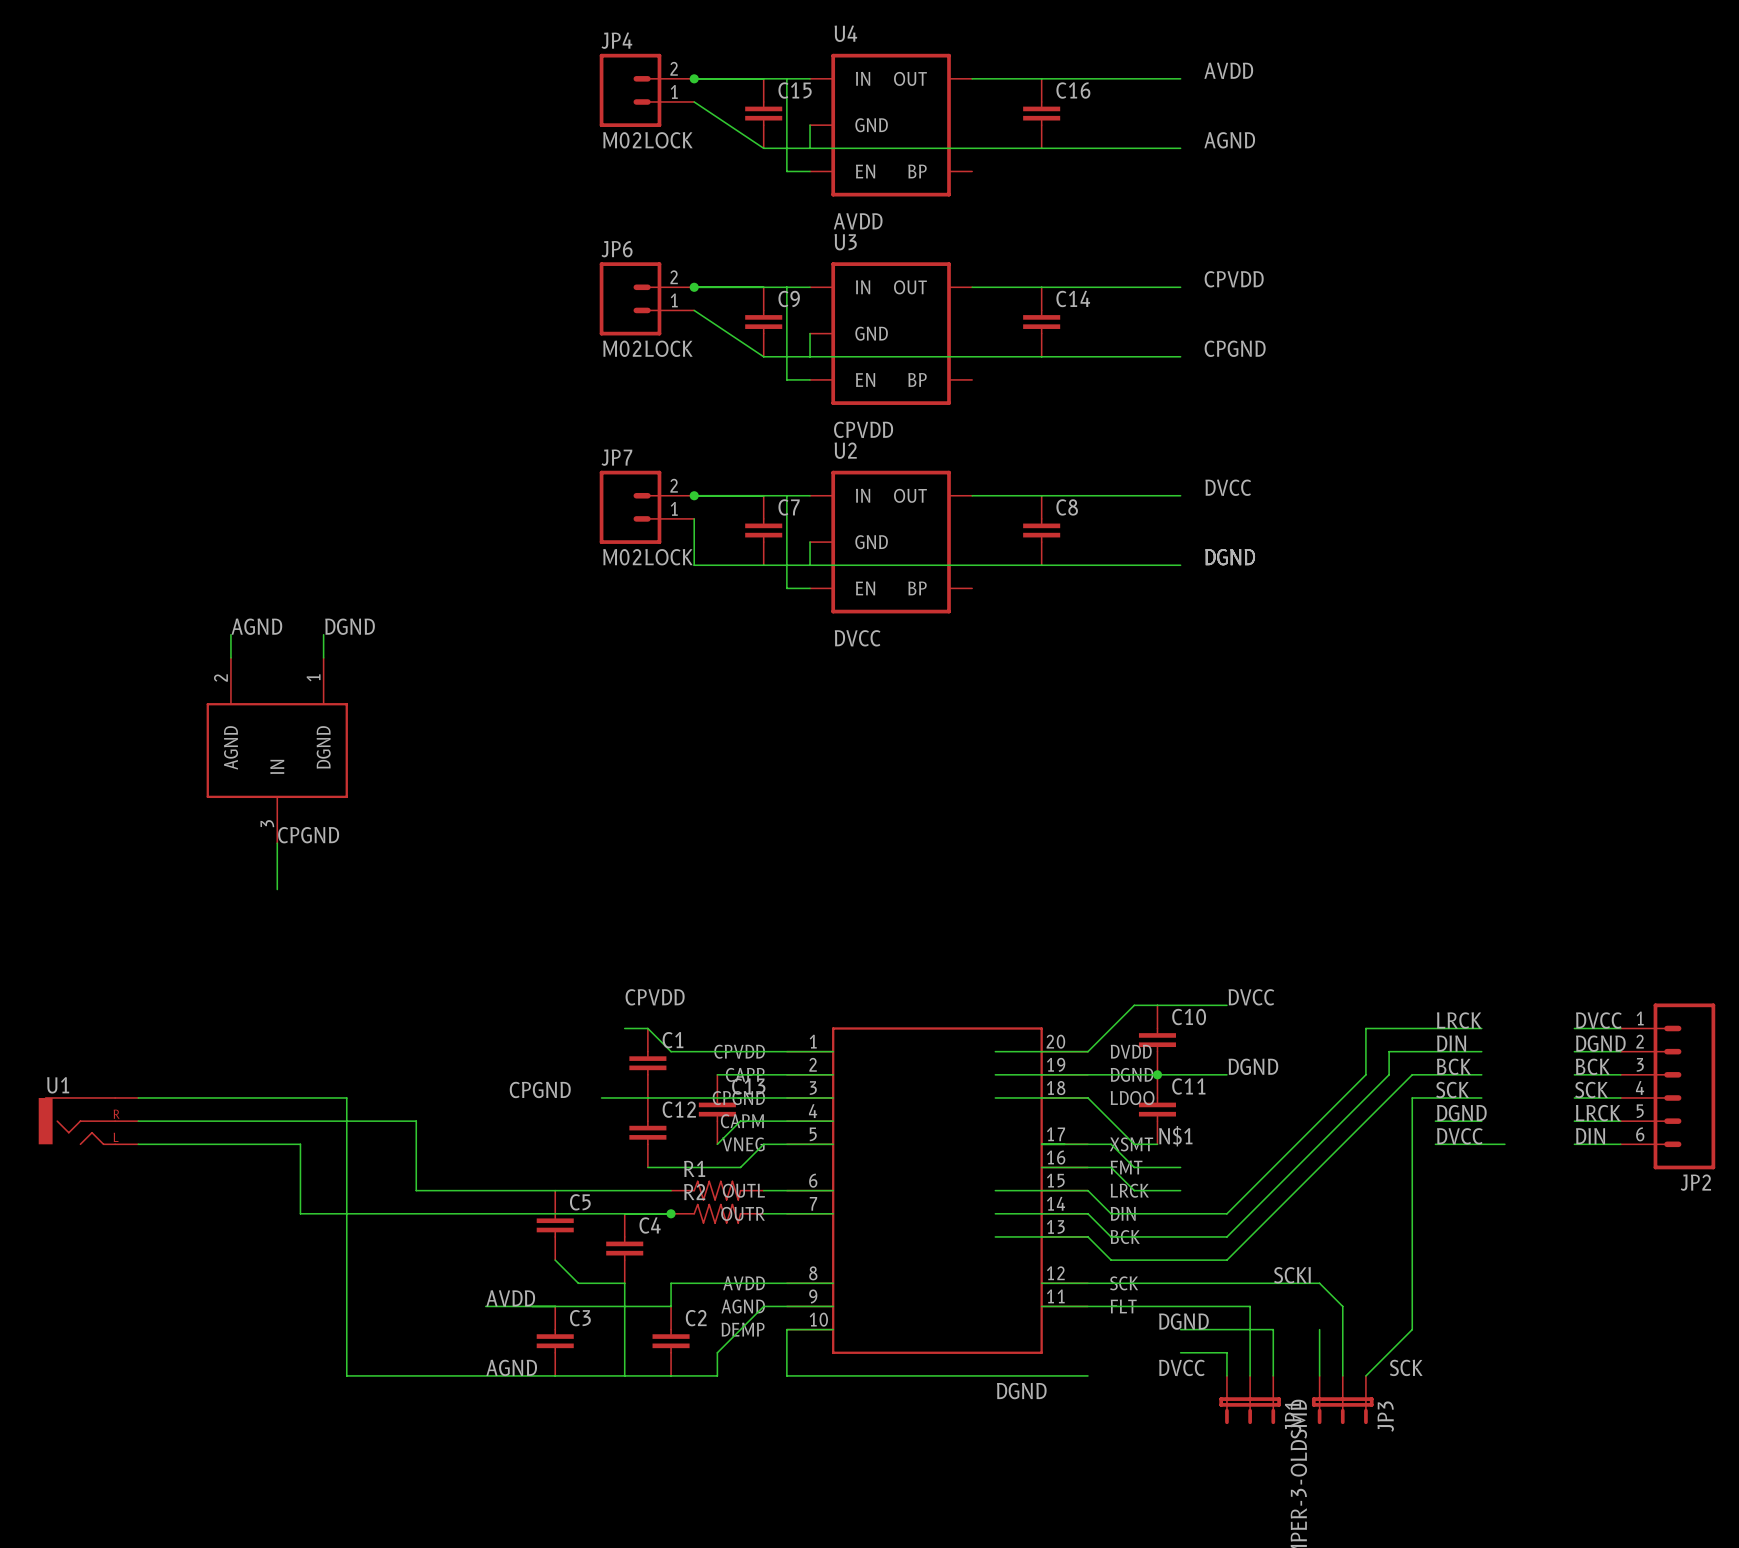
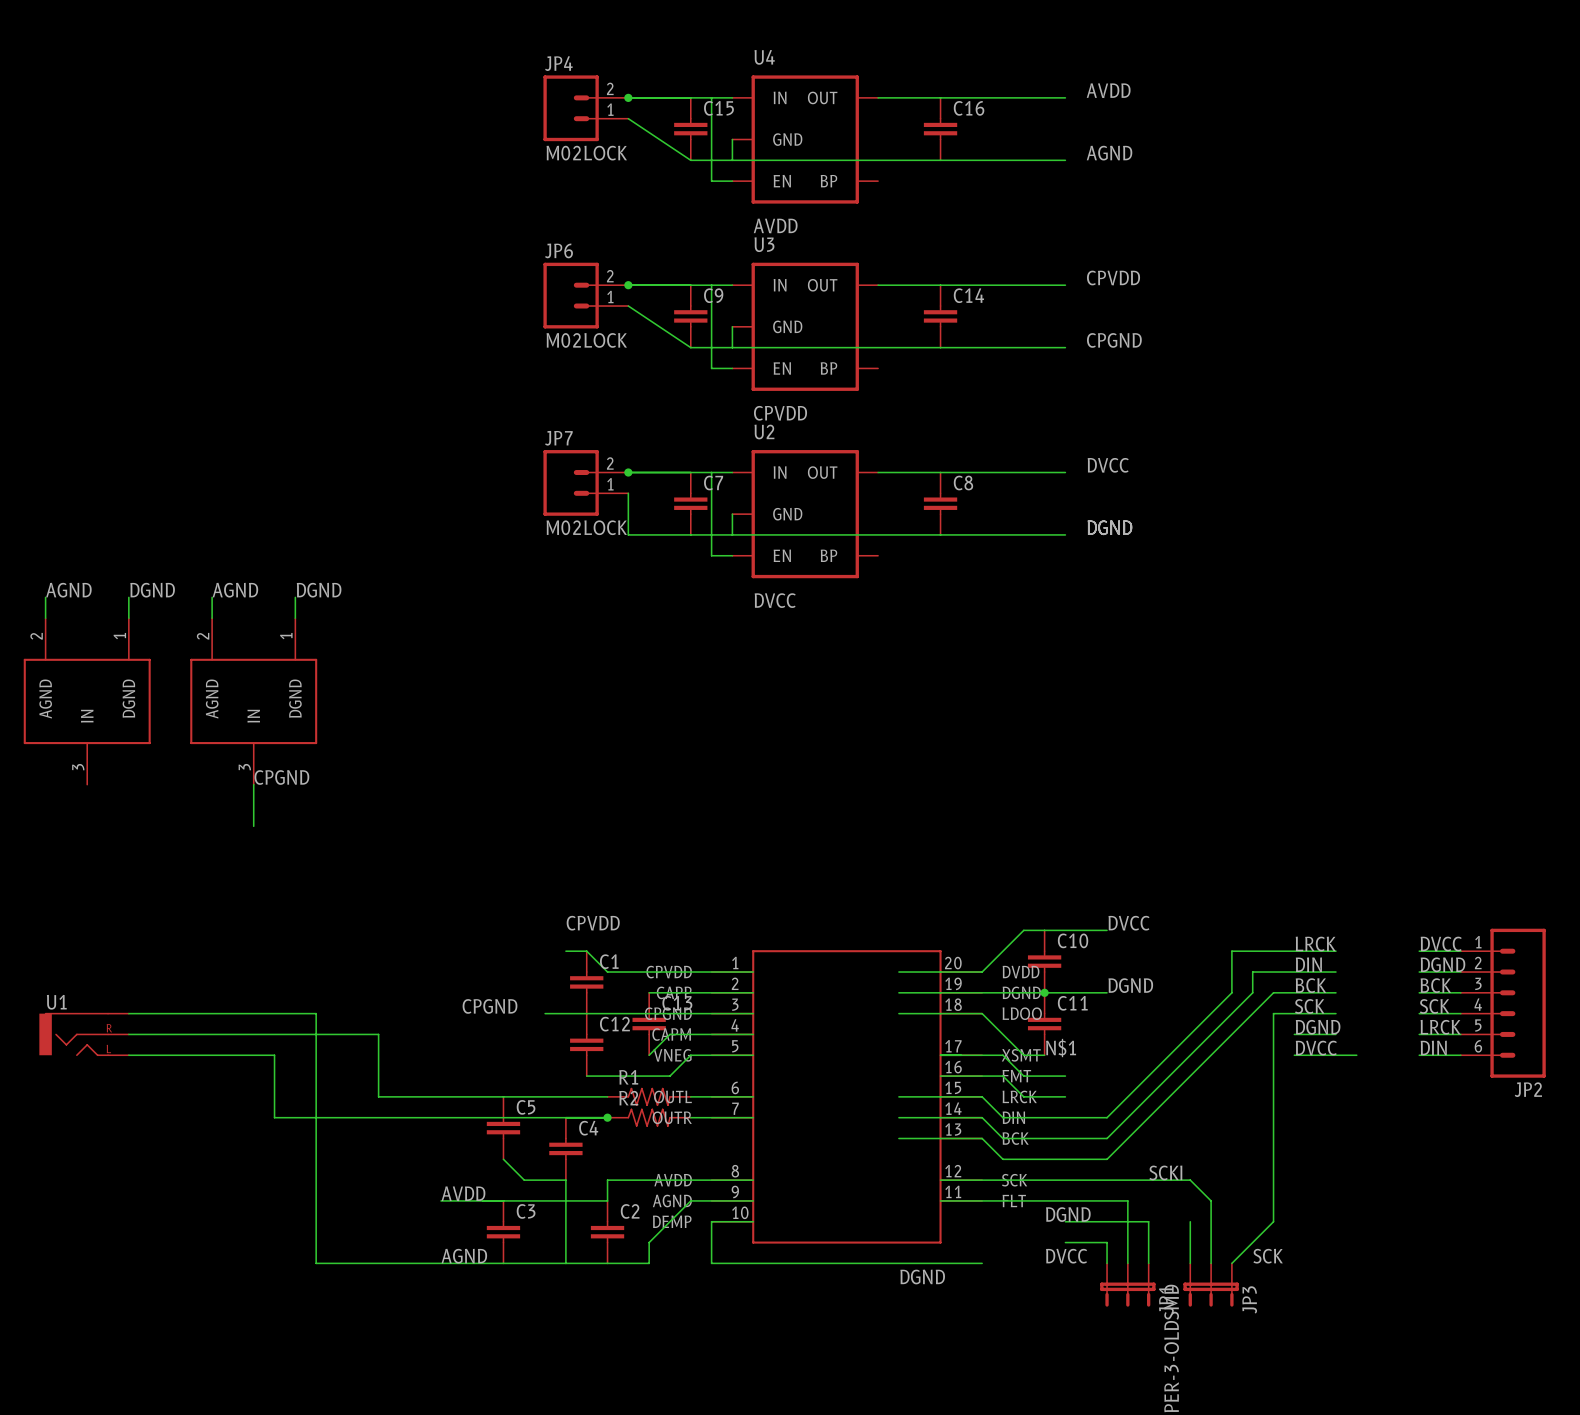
label: none -> AGND (68, 590)
label: none -> DGND (152, 590)
wire: none -> (45, 597) (45, 618)
wire: none -> (128, 597) (128, 618)
part: none -> (87, 701)

